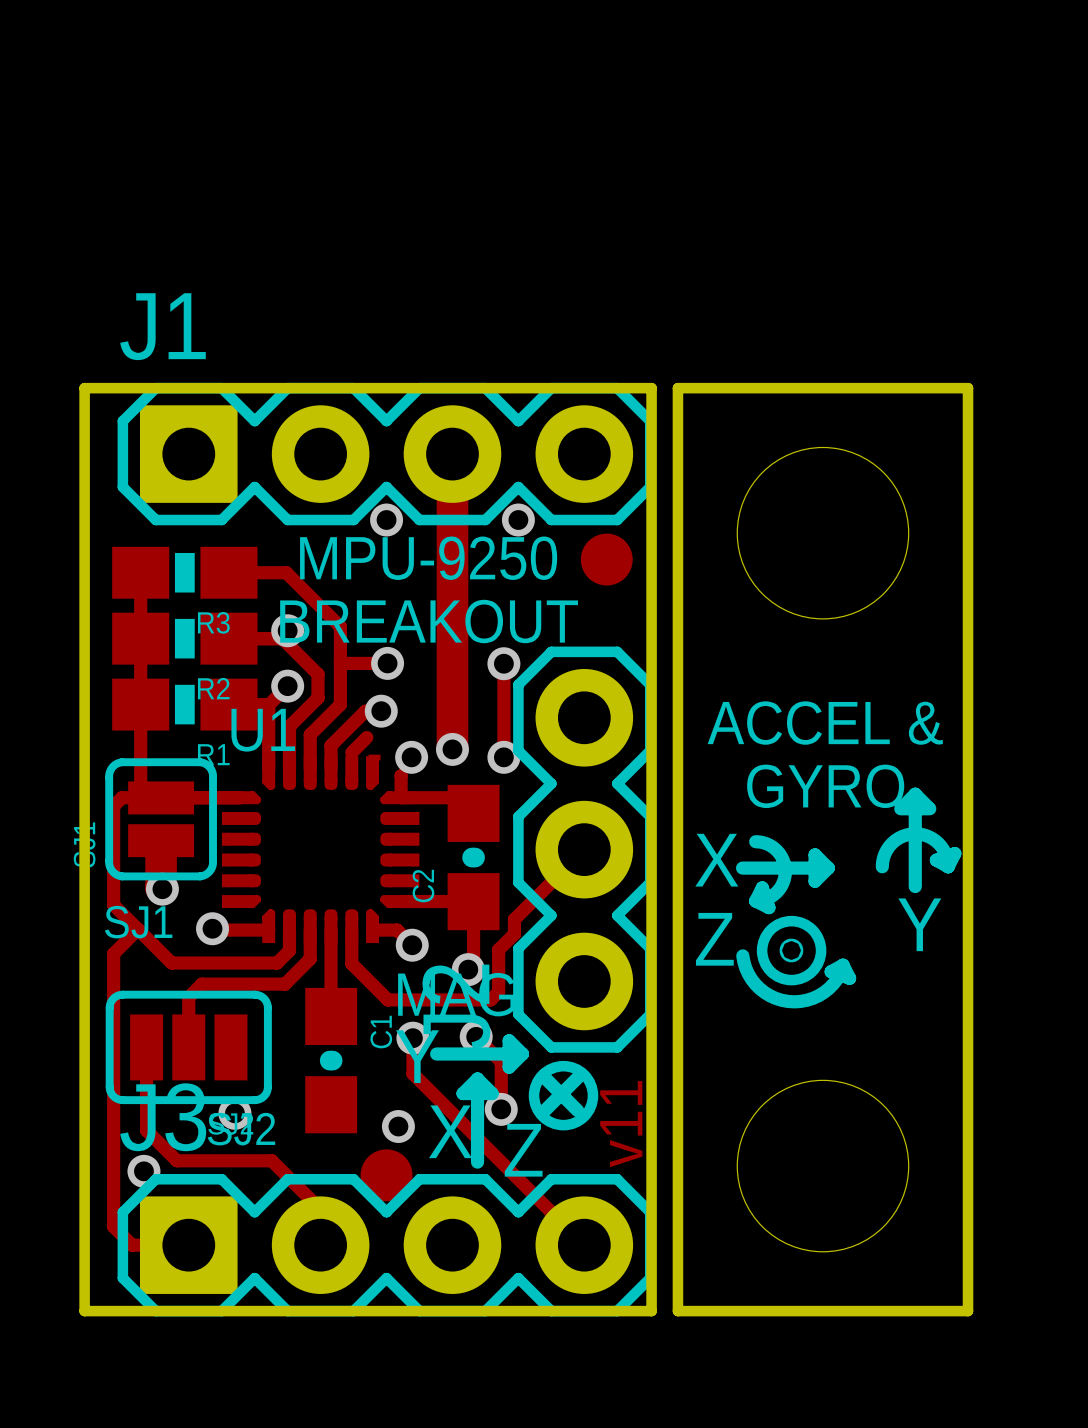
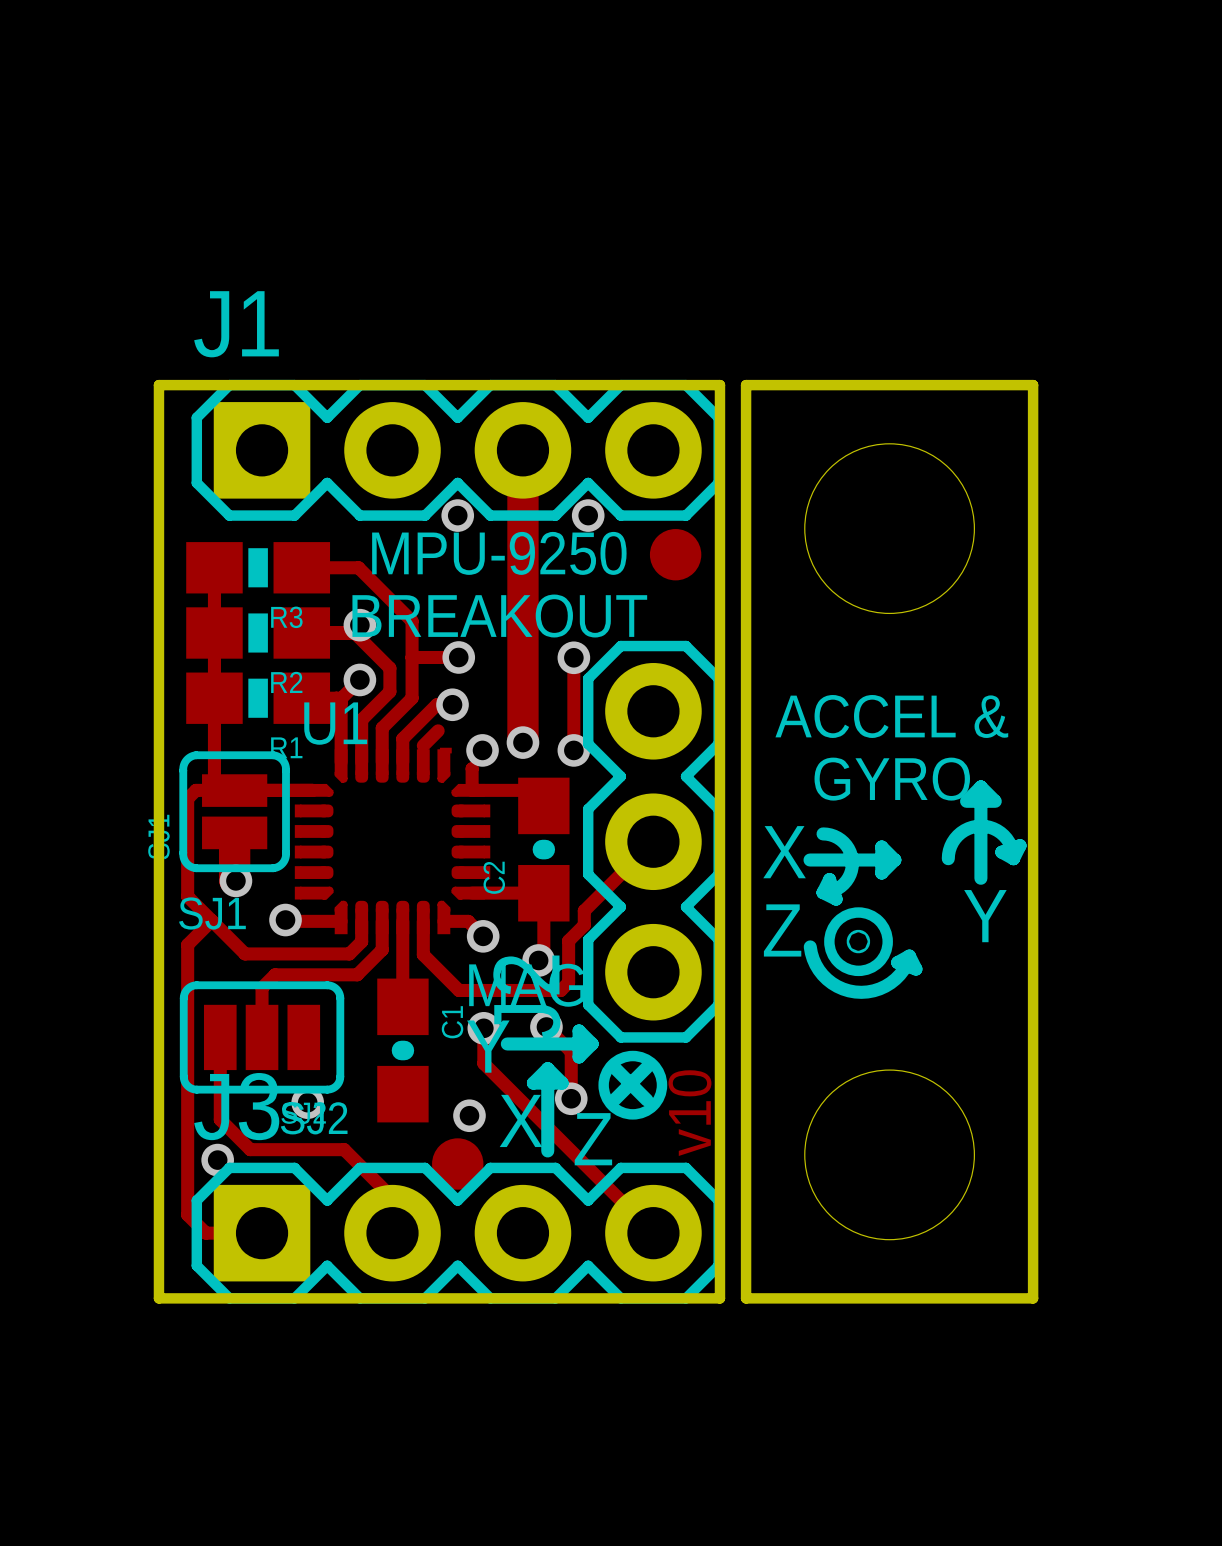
text: v11 (621, 1124) -> v10 (689, 1113)

